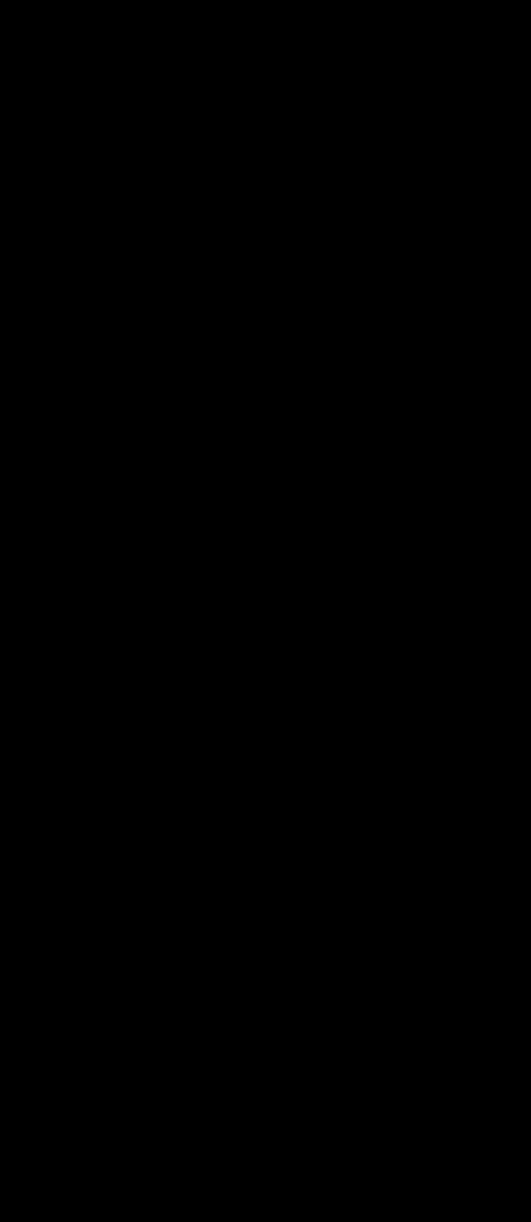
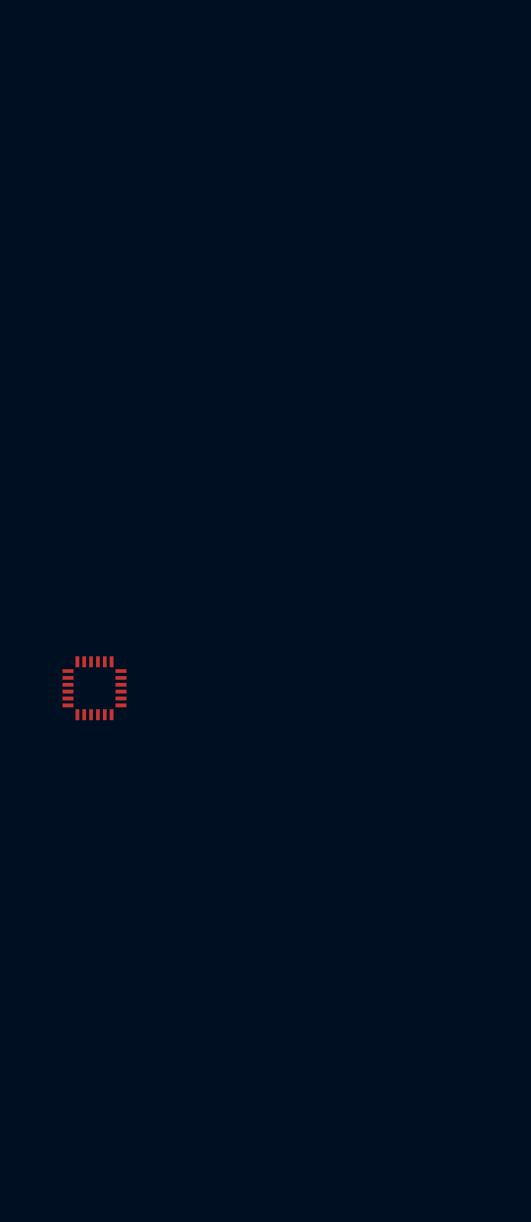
part: none -> (94, 688)

